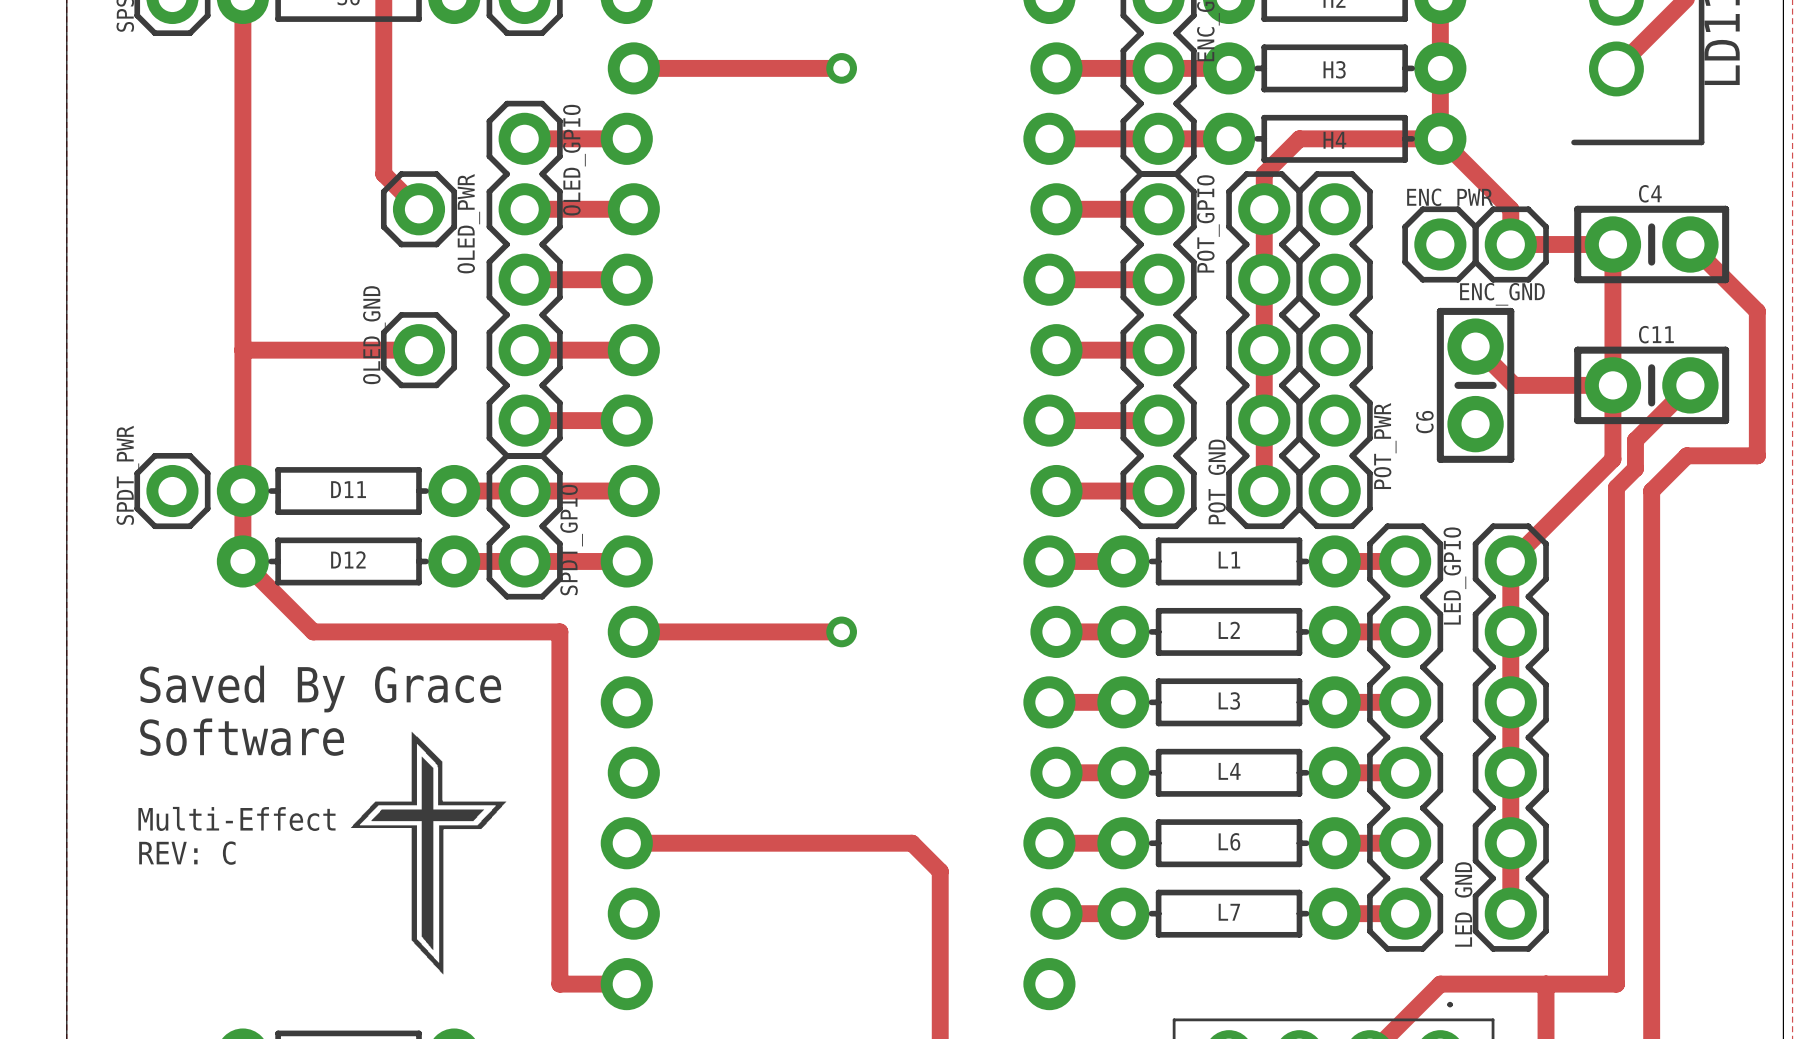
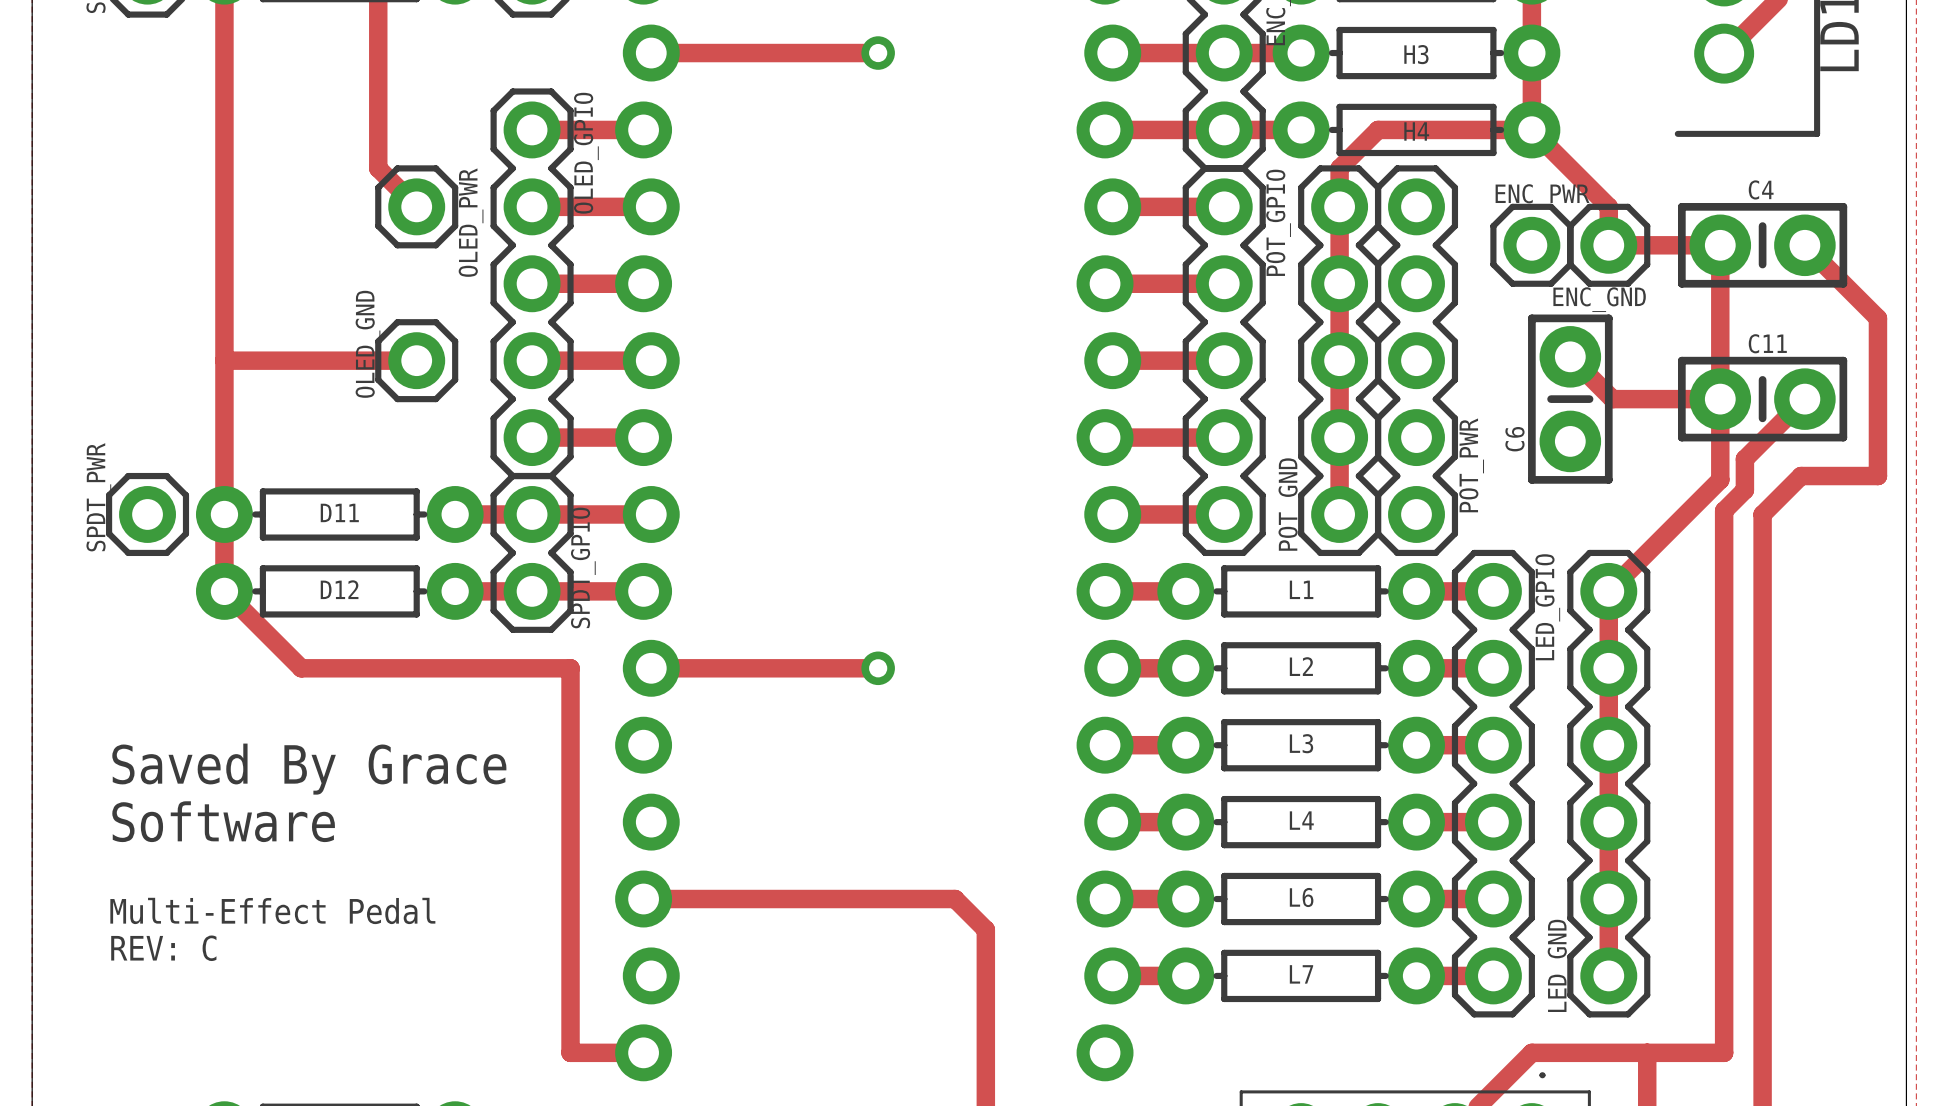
text position: Saved By Grace (320, 689) -> Saved By Grace (309, 769)
drawing: [350, 731, 507, 975] -> none
text position: Software (242, 737) -> Software (223, 821)
text: Multi-Effect (236, 818) -> none
text: REV: C (187, 853) -> Multi-Effect Pedal (272, 910)
text: none -> REV: C (163, 948)

